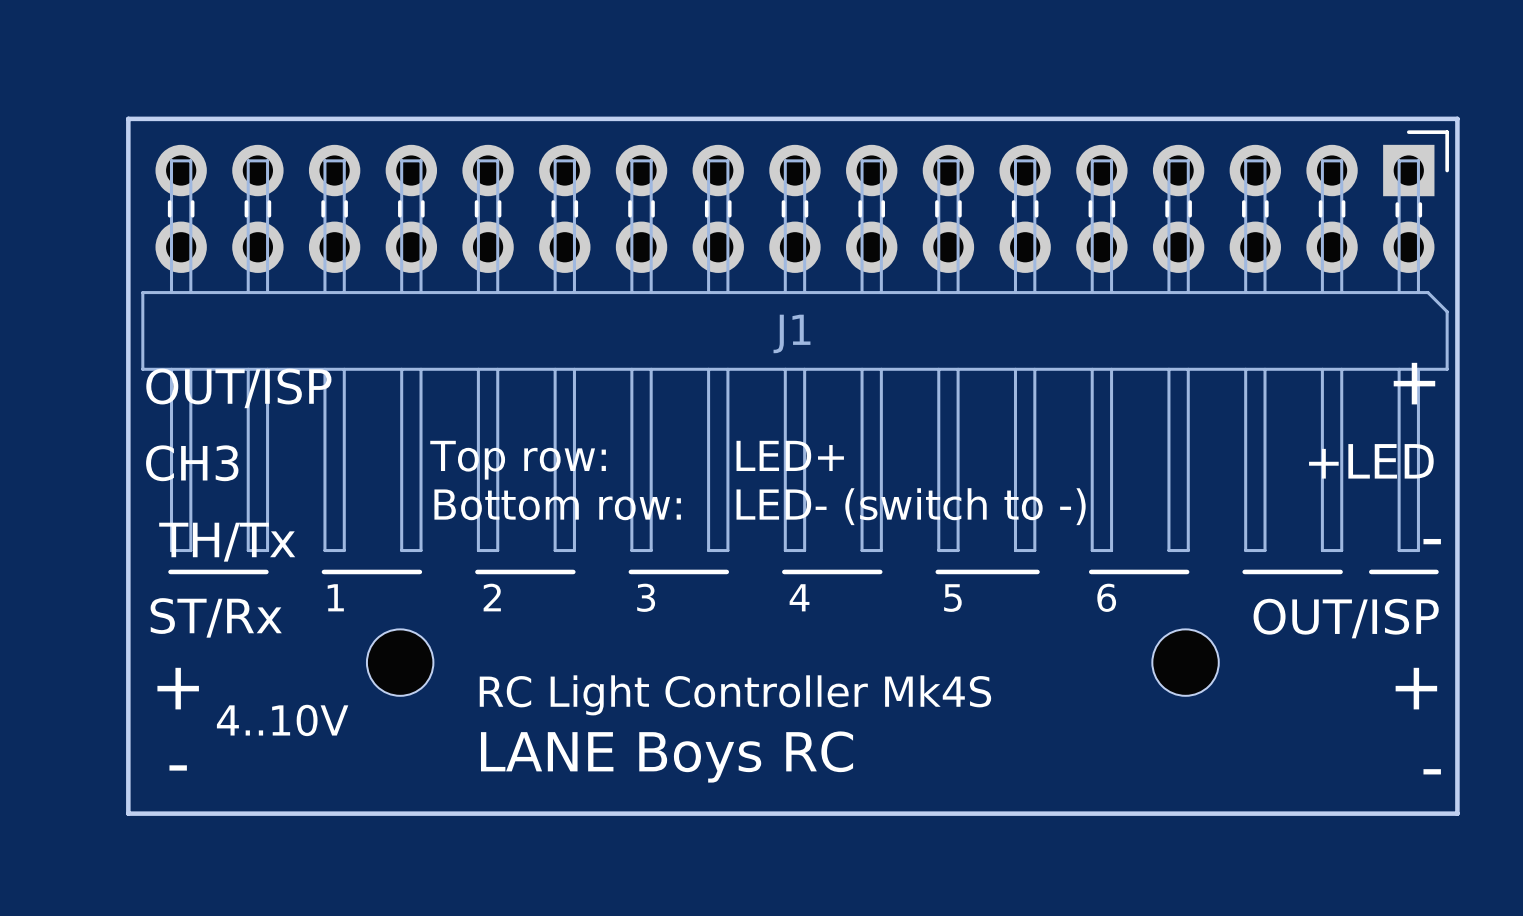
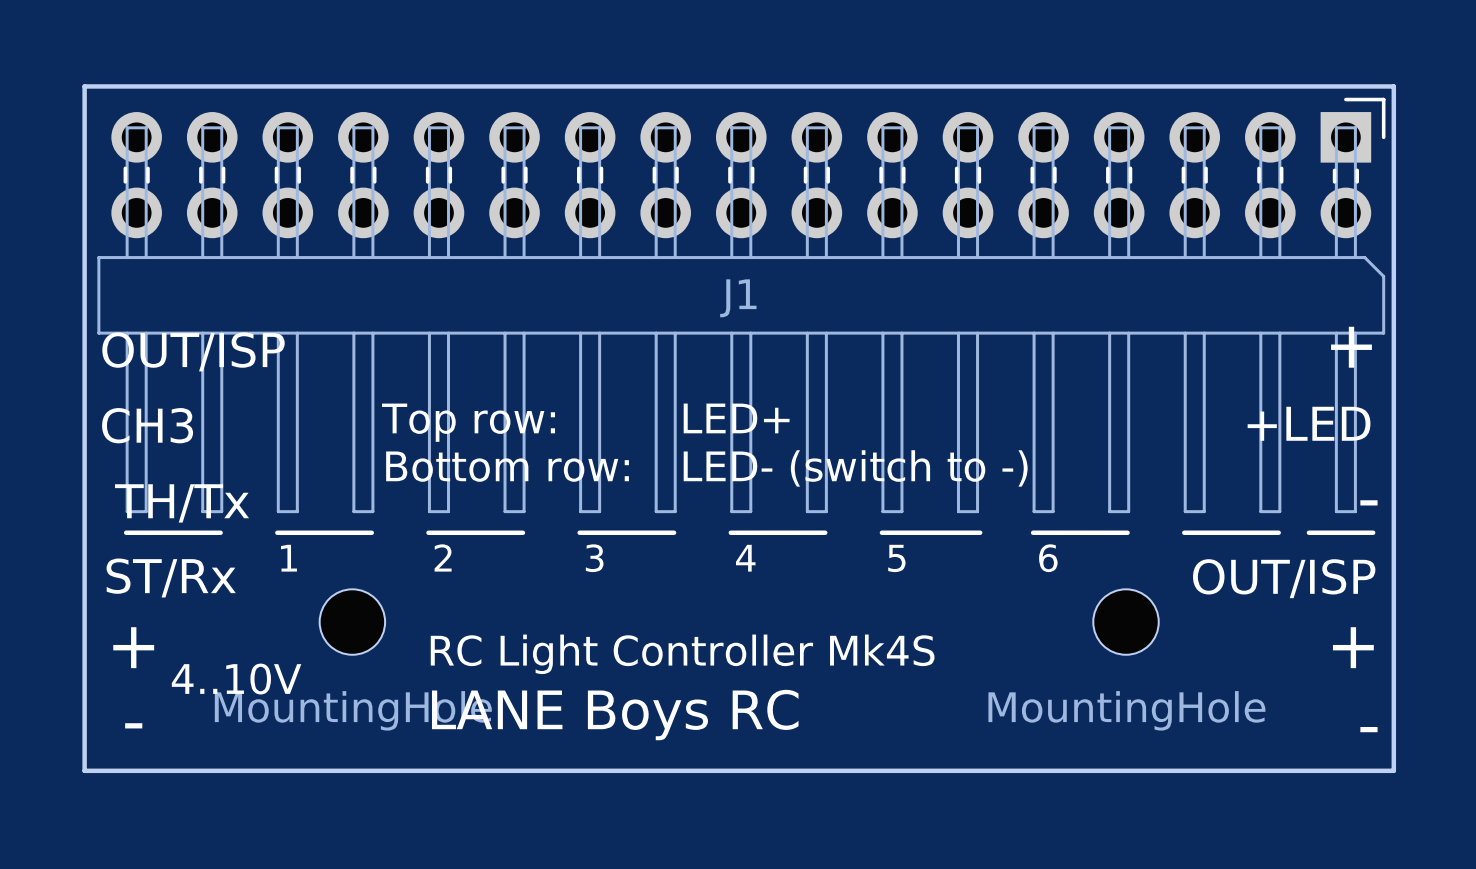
part value: none -> MountingHole (353, 710)
part value: none -> MountingHole (1126, 710)

